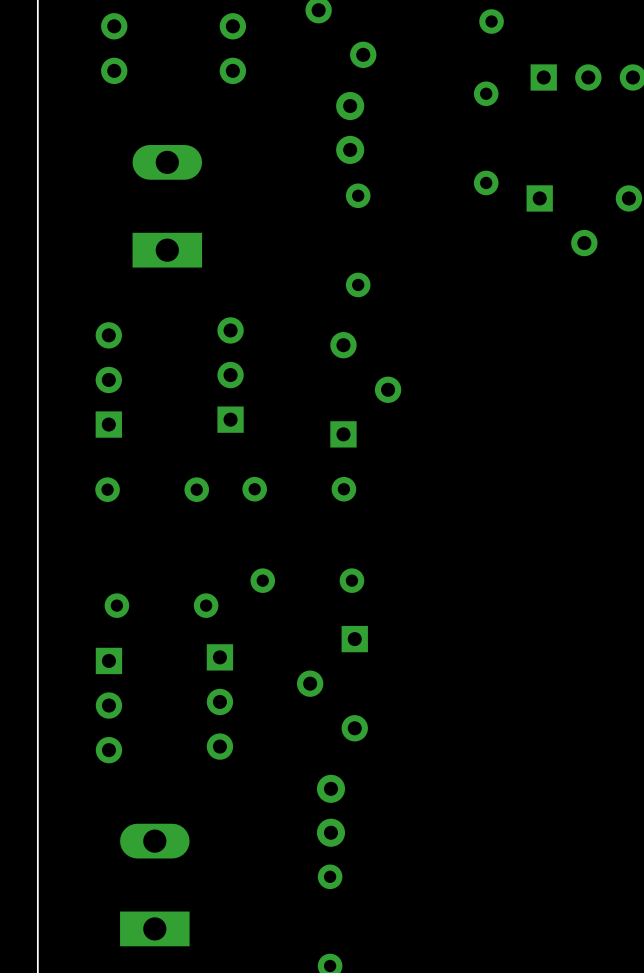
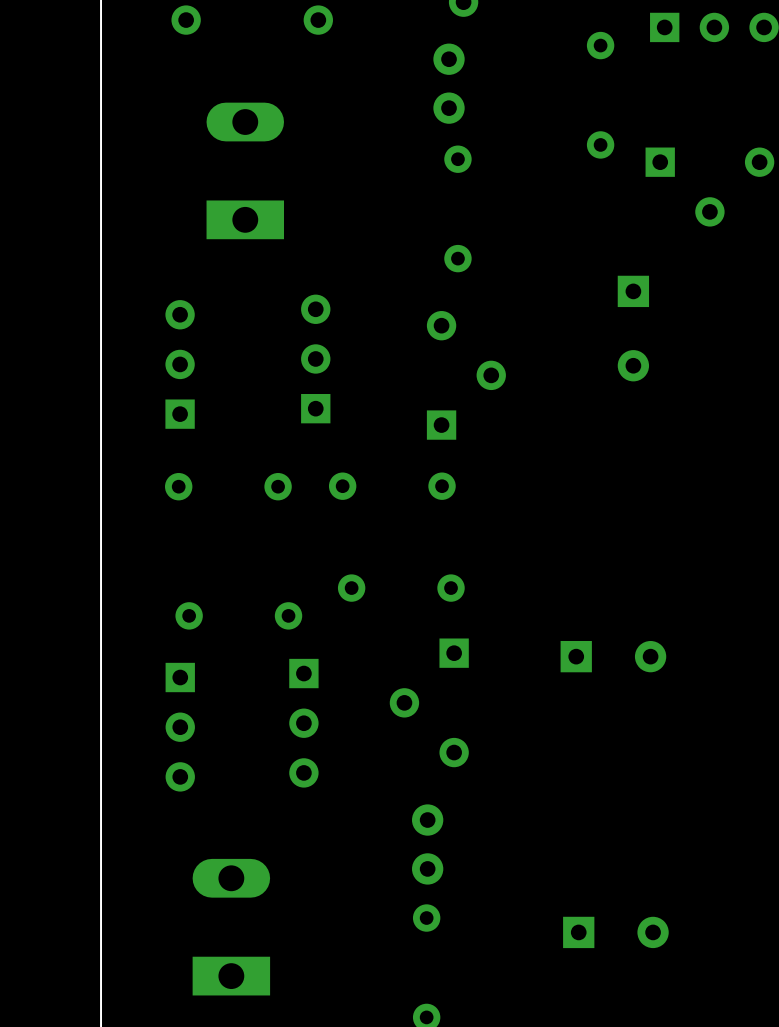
part: none -> (633, 328)
part: none -> (613, 656)
part: none -> (615, 932)

